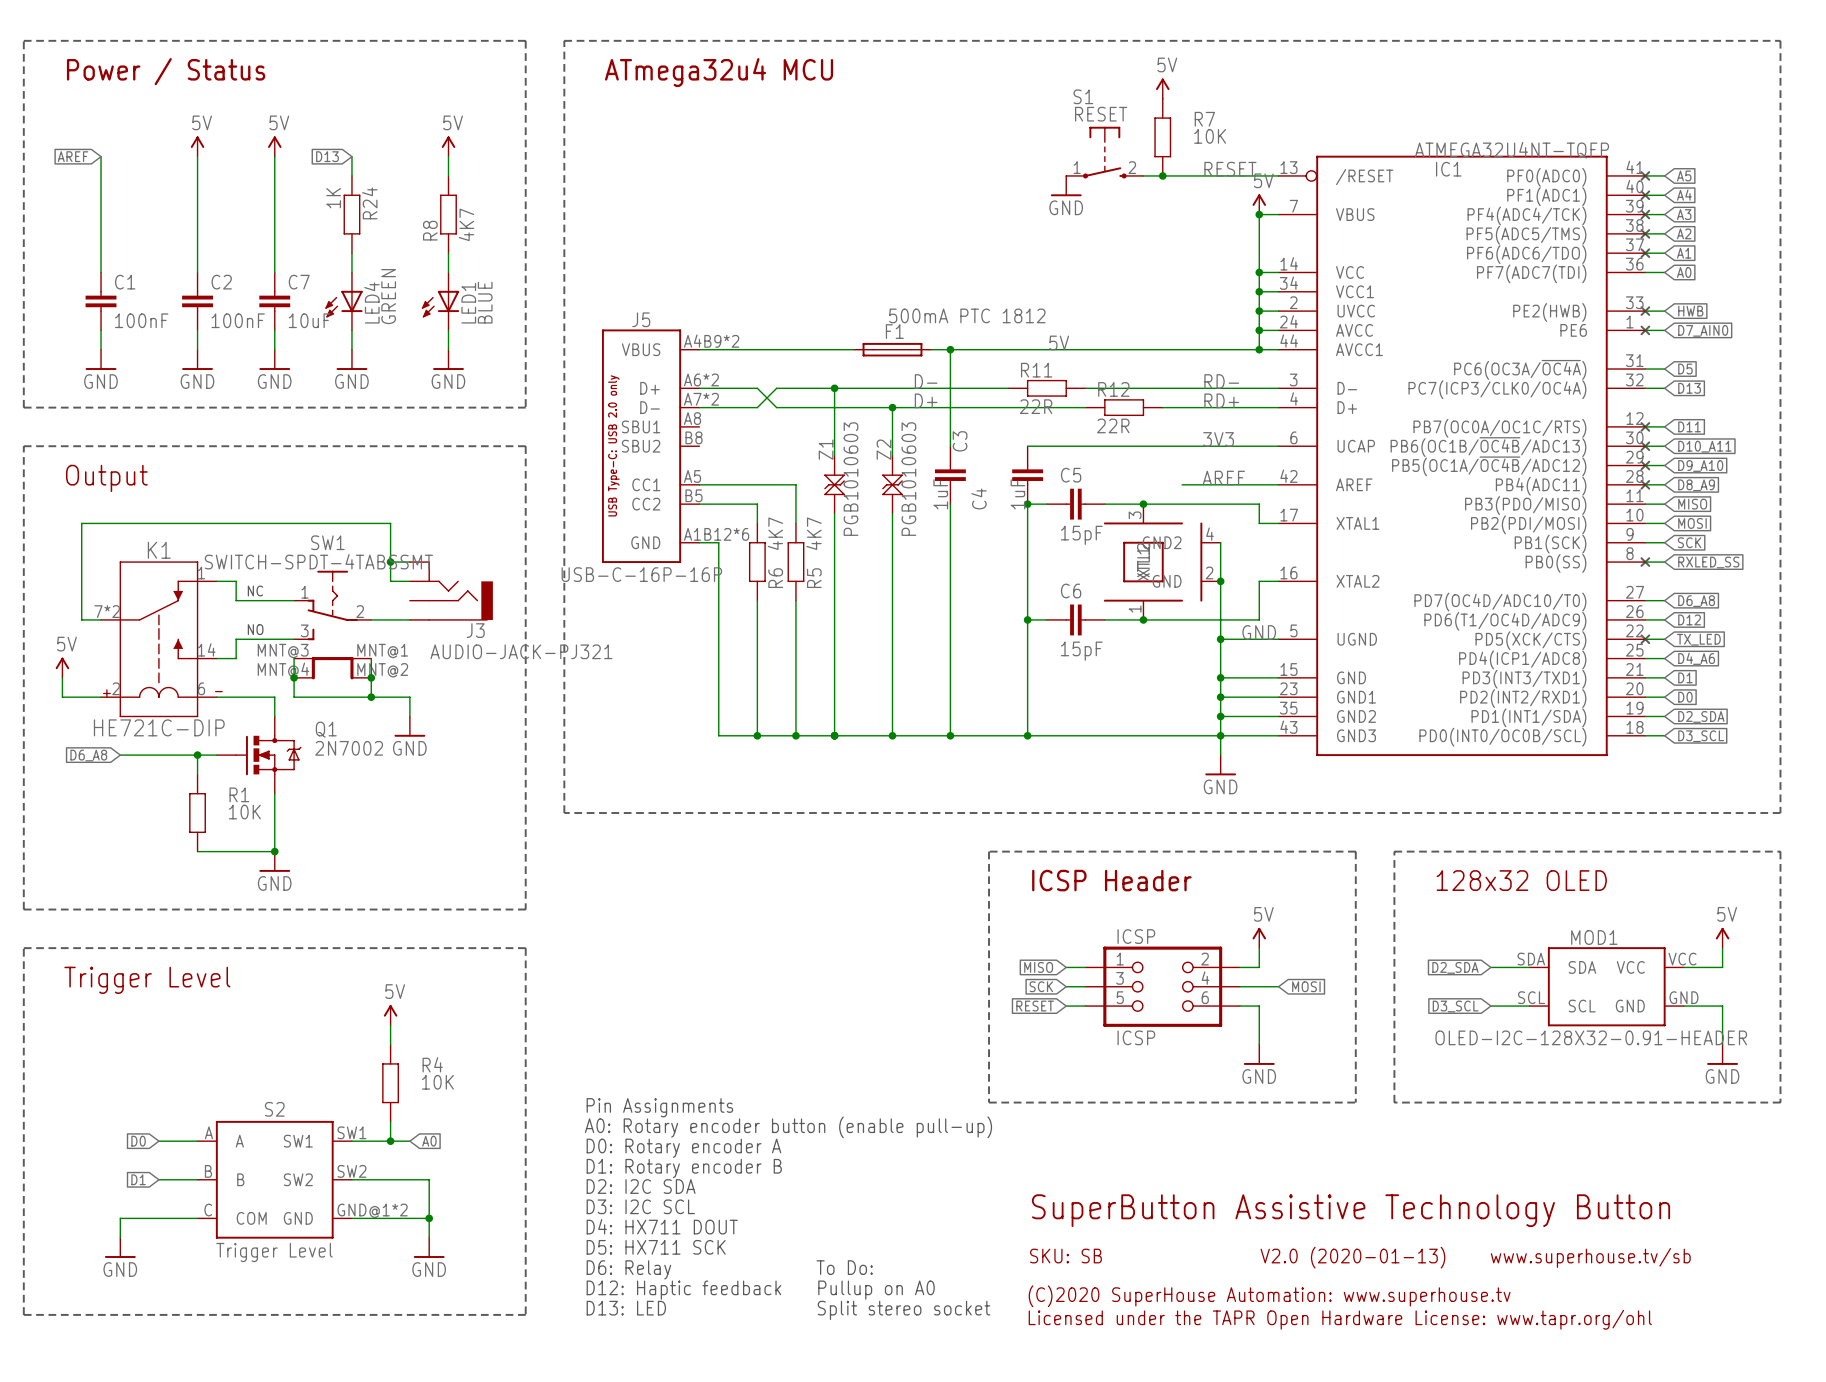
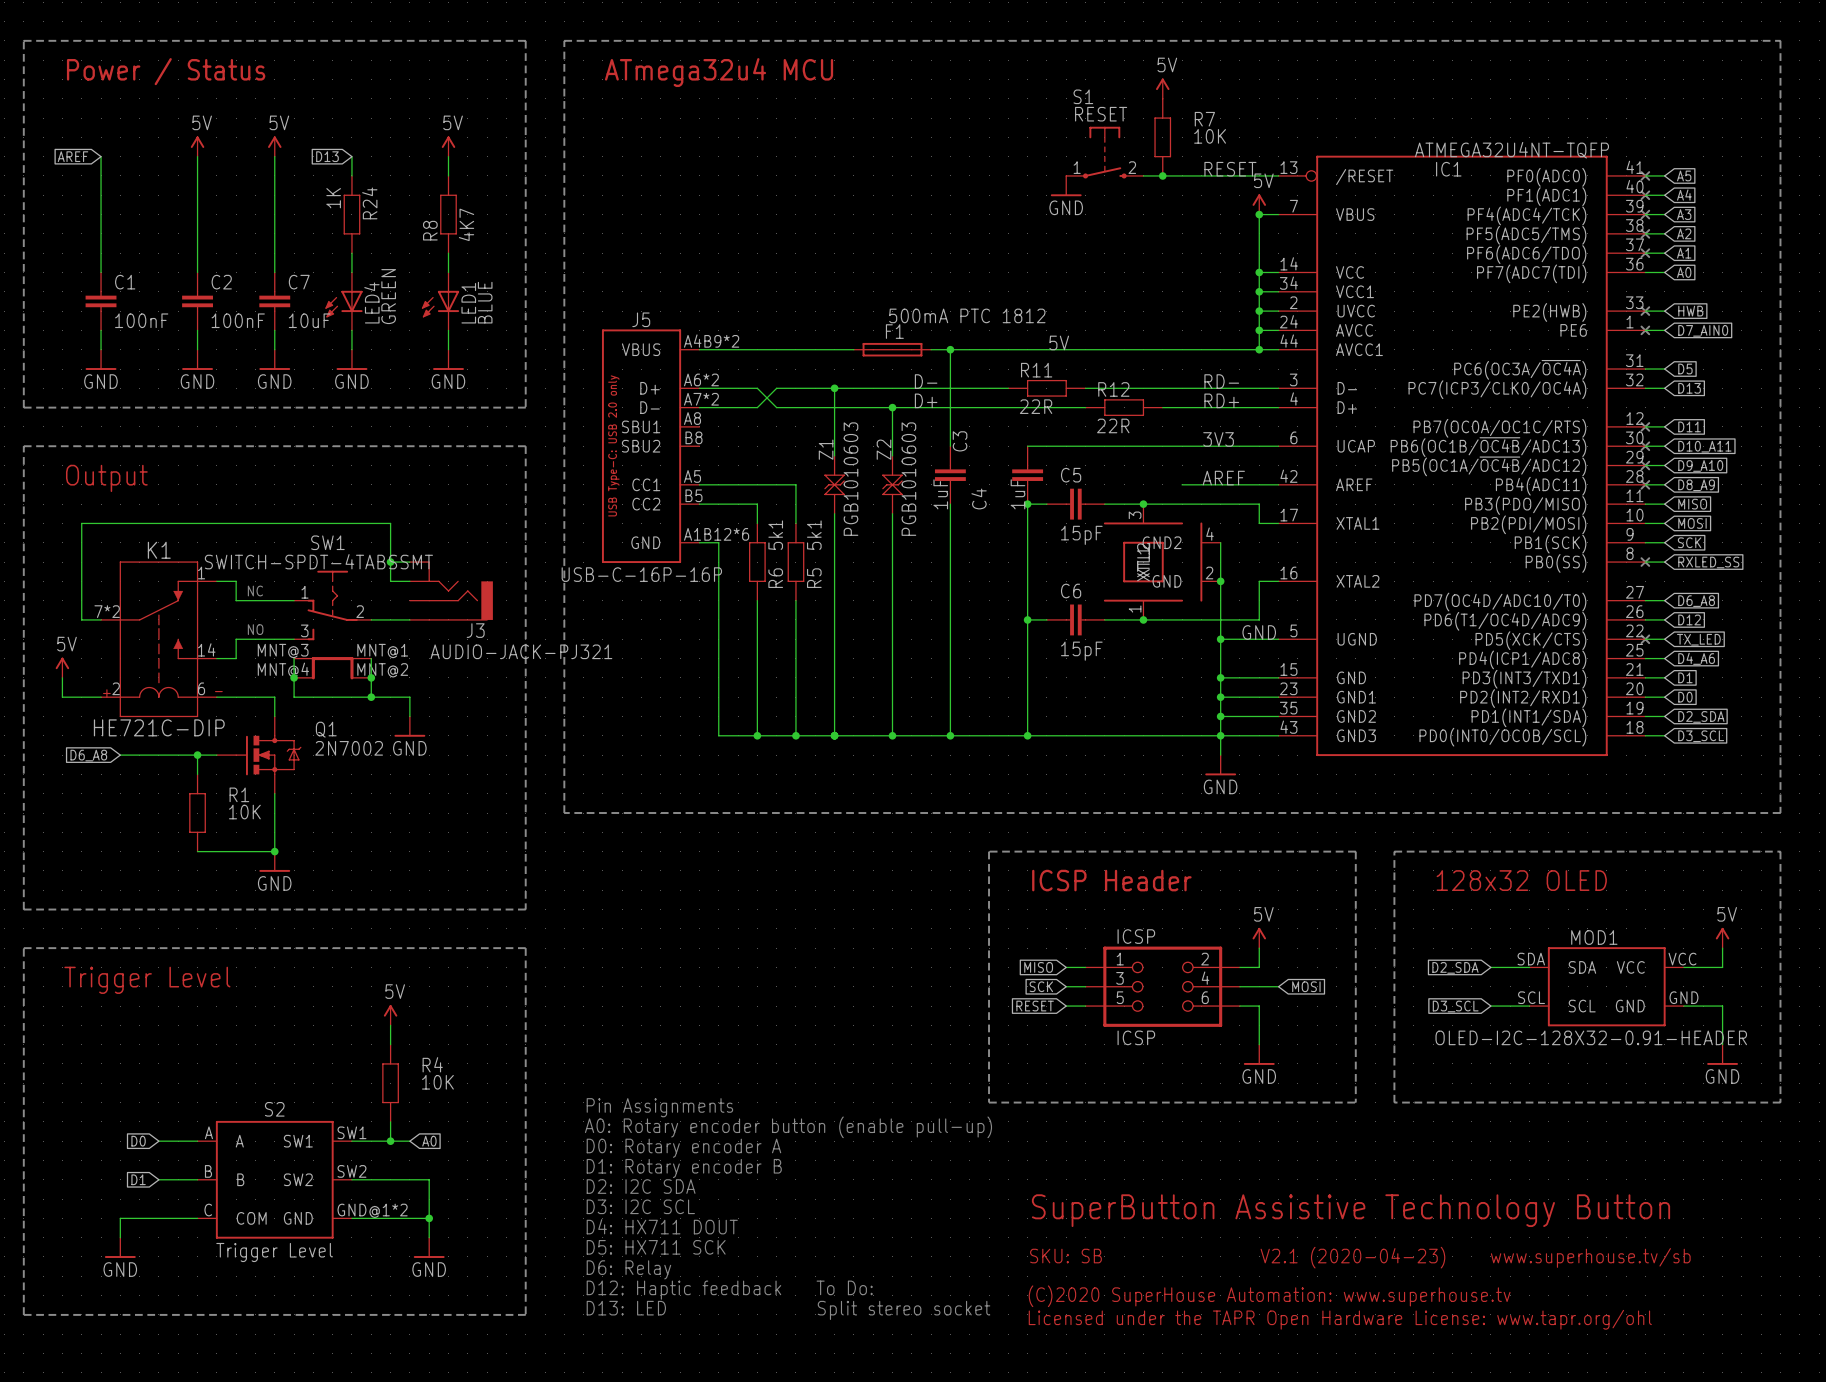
R6 value: 4K7 (775, 533) -> 5k1 (775, 535)
R5 value: 4K7 (813, 533) -> 5k1 (814, 535)
text: V2.0 (2020-01-13) (1352, 1257) -> V2.1 (2020-04-23) (1352, 1257)
text: To Do: (844, 1267) -> none
text: Pullup on A0 (876, 1290) -> To Do: (844, 1287)

